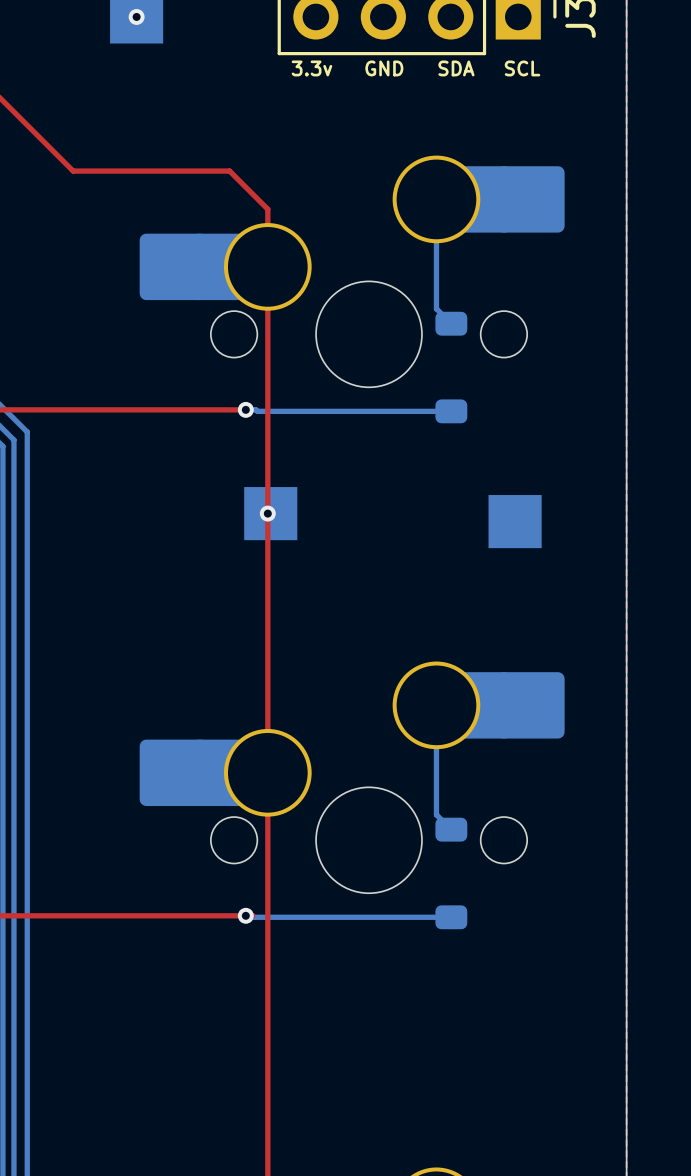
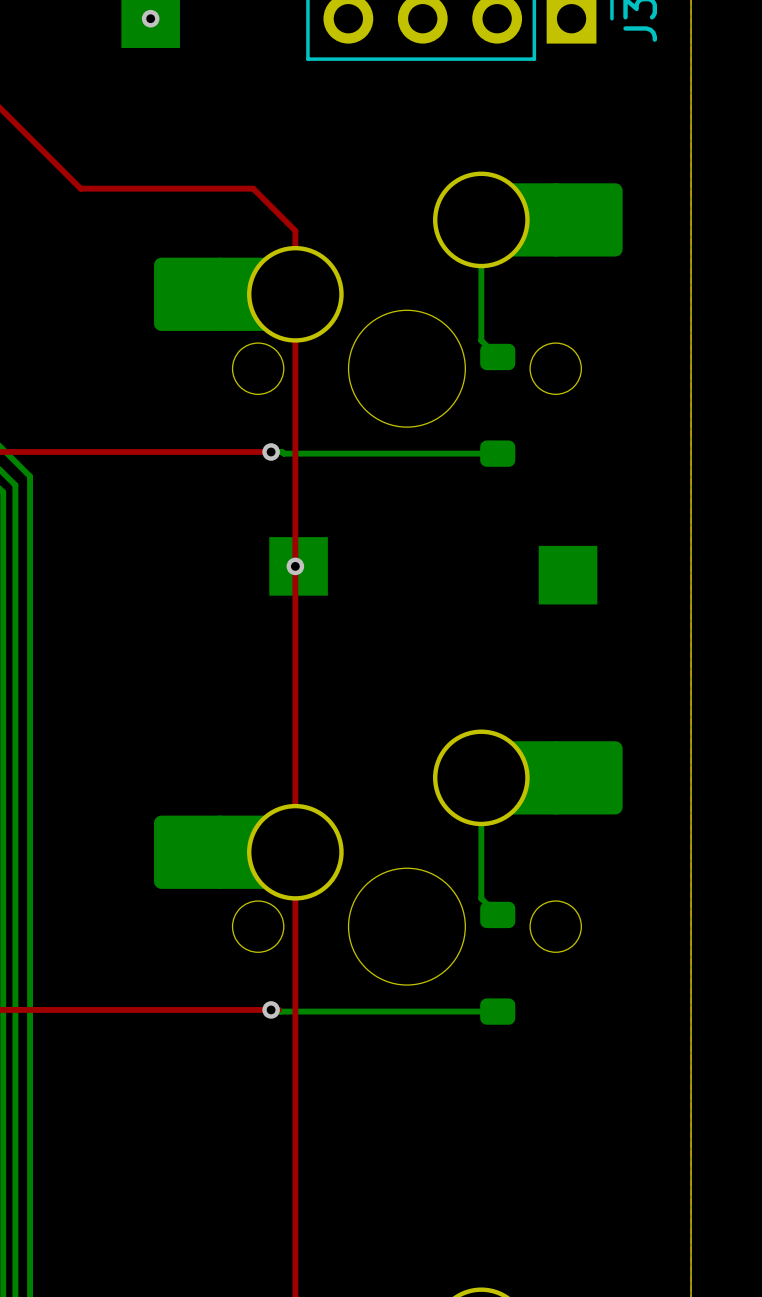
text: 3.3v (311, 68) -> none
text: GND (384, 68) -> none
text: SDA (456, 68) -> none
text: SCL (522, 68) -> none

